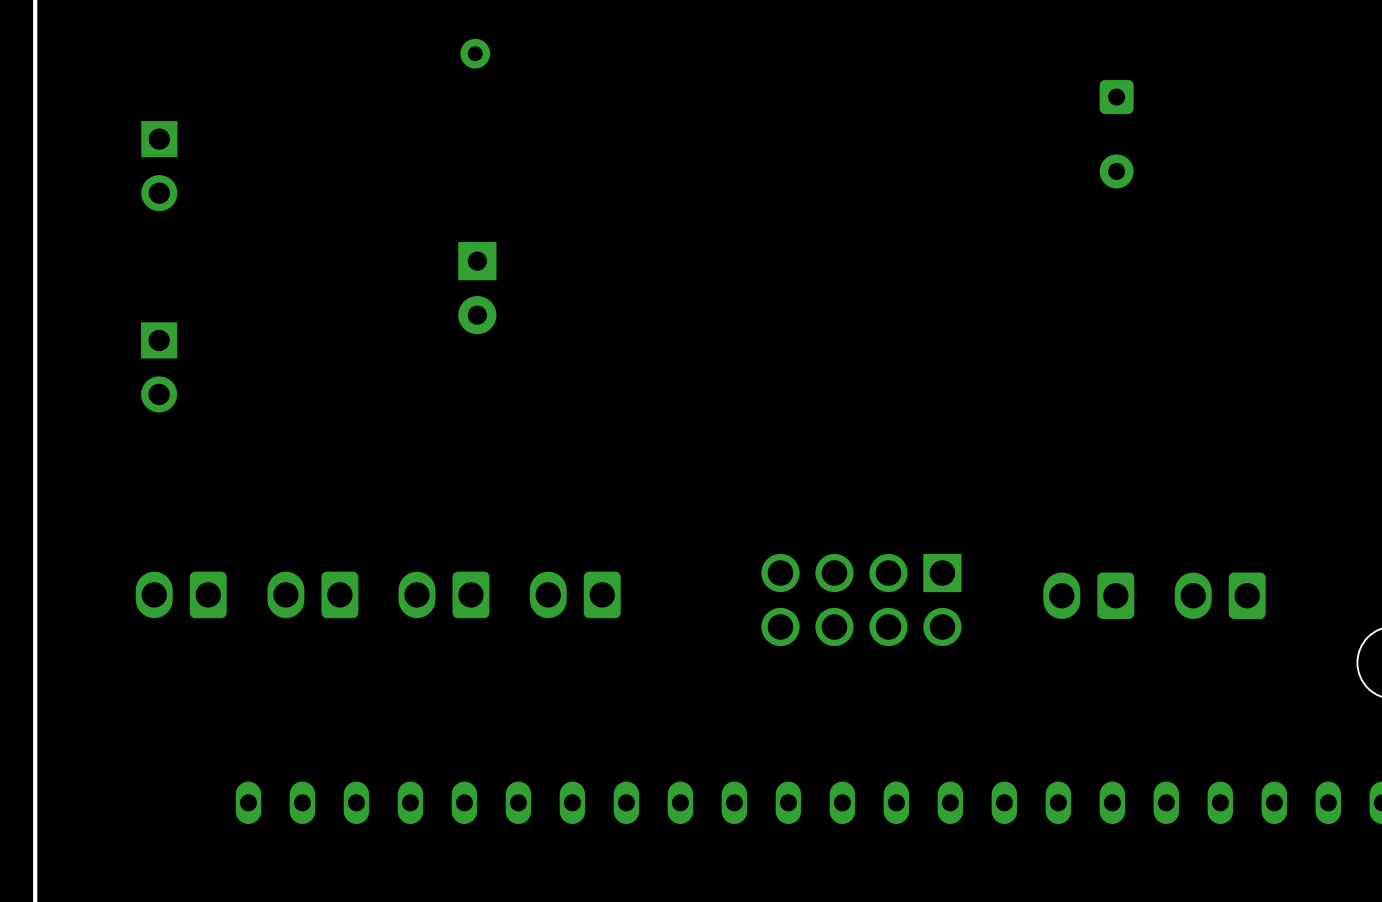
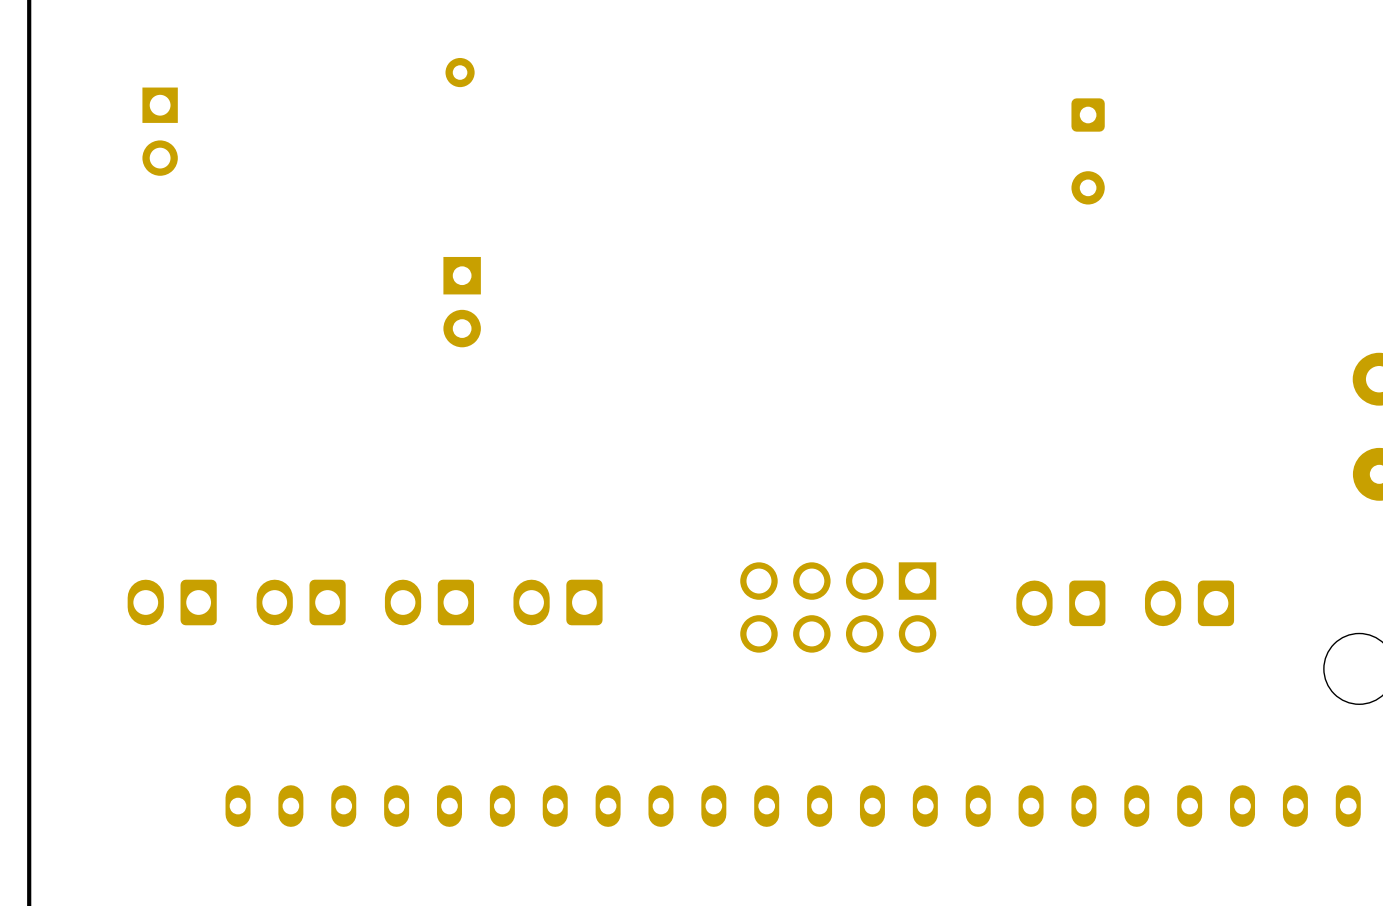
part position: (159, 166) -> (160, 131)
part: (159, 367) -> none

